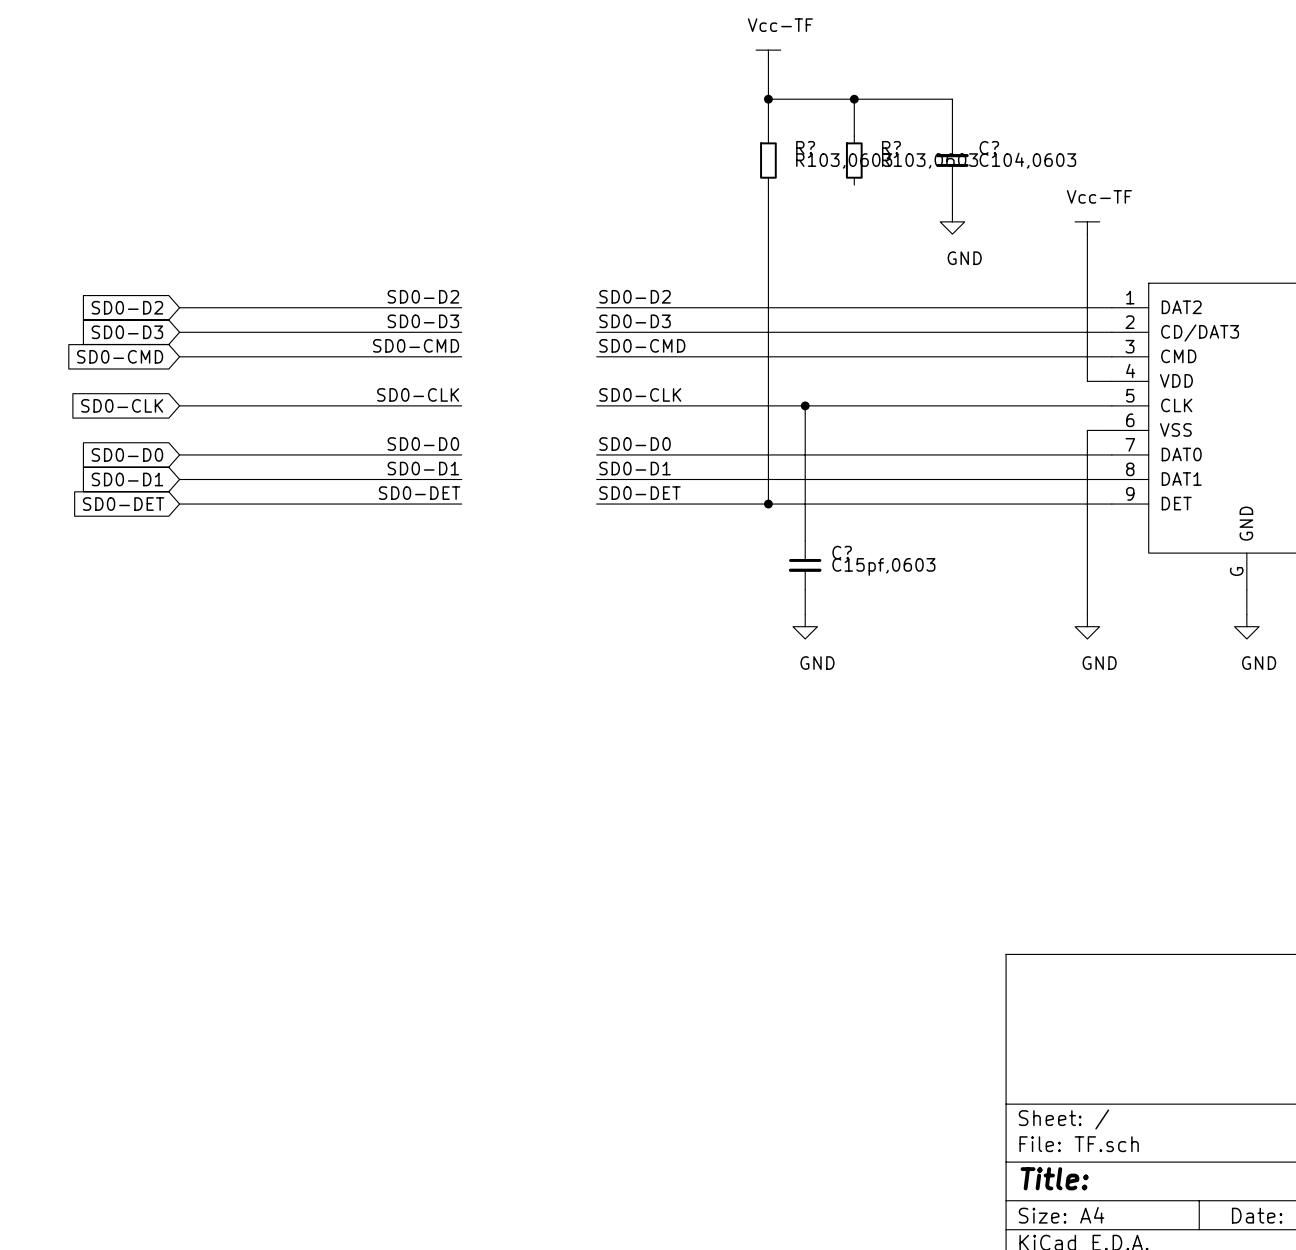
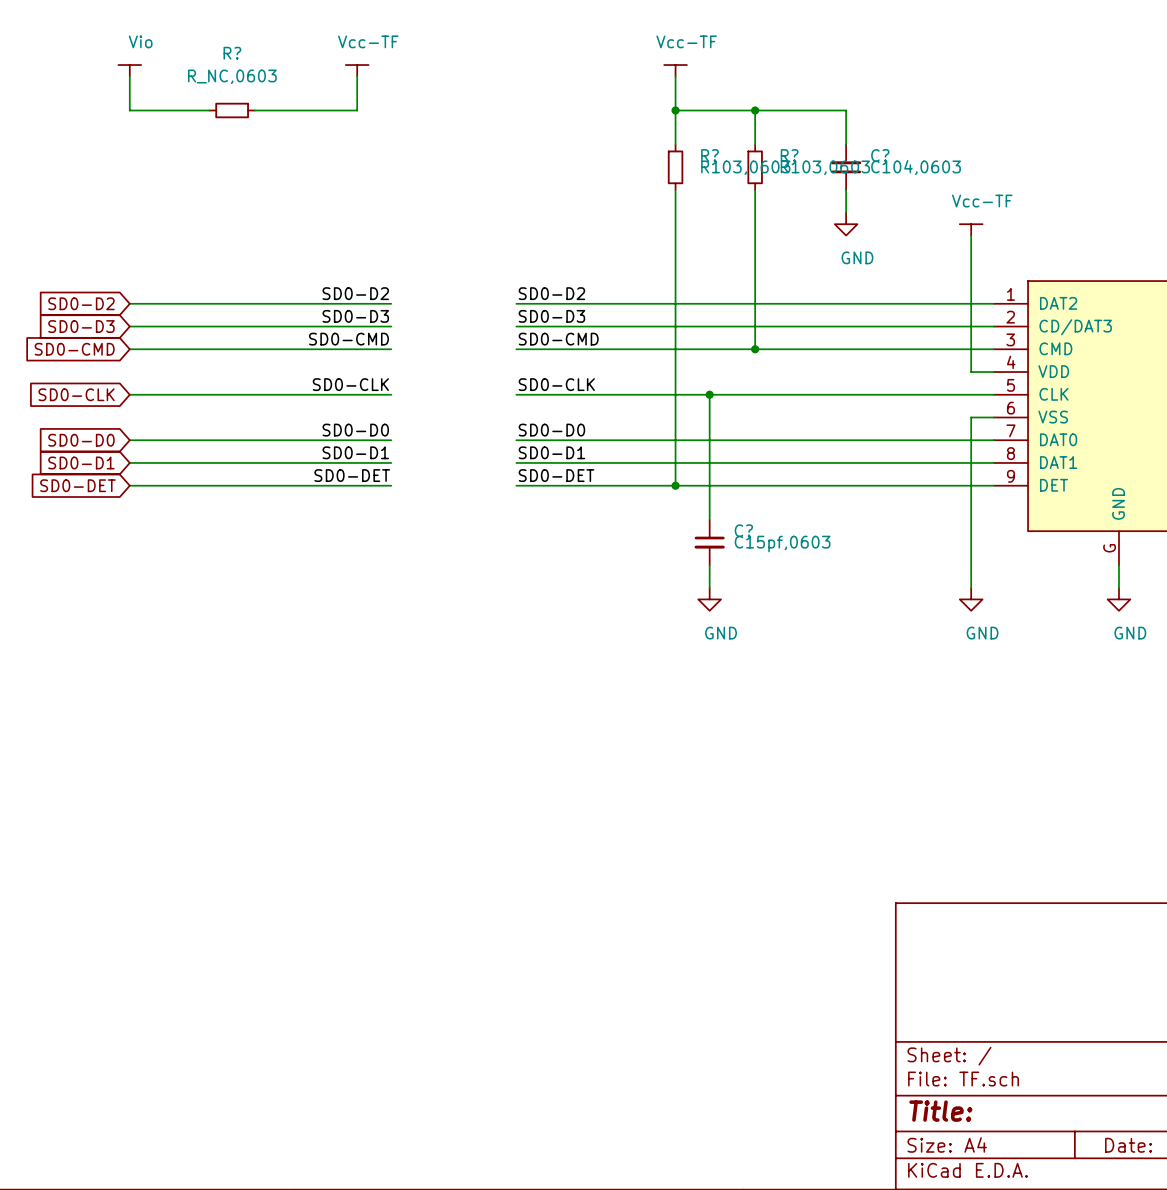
power symbol: none -> Vio (129, 70)
power symbol: none -> Vcc-TF (357, 70)
wire: none -> (129, 76) (129, 110) (209, 110)
wire: none -> (357, 76) (357, 110) (254, 110)
R?: none -> R_NC,0603 (232, 110)
wire: none -> (755, 190) (755, 349)
junction: none -> (755, 349)

